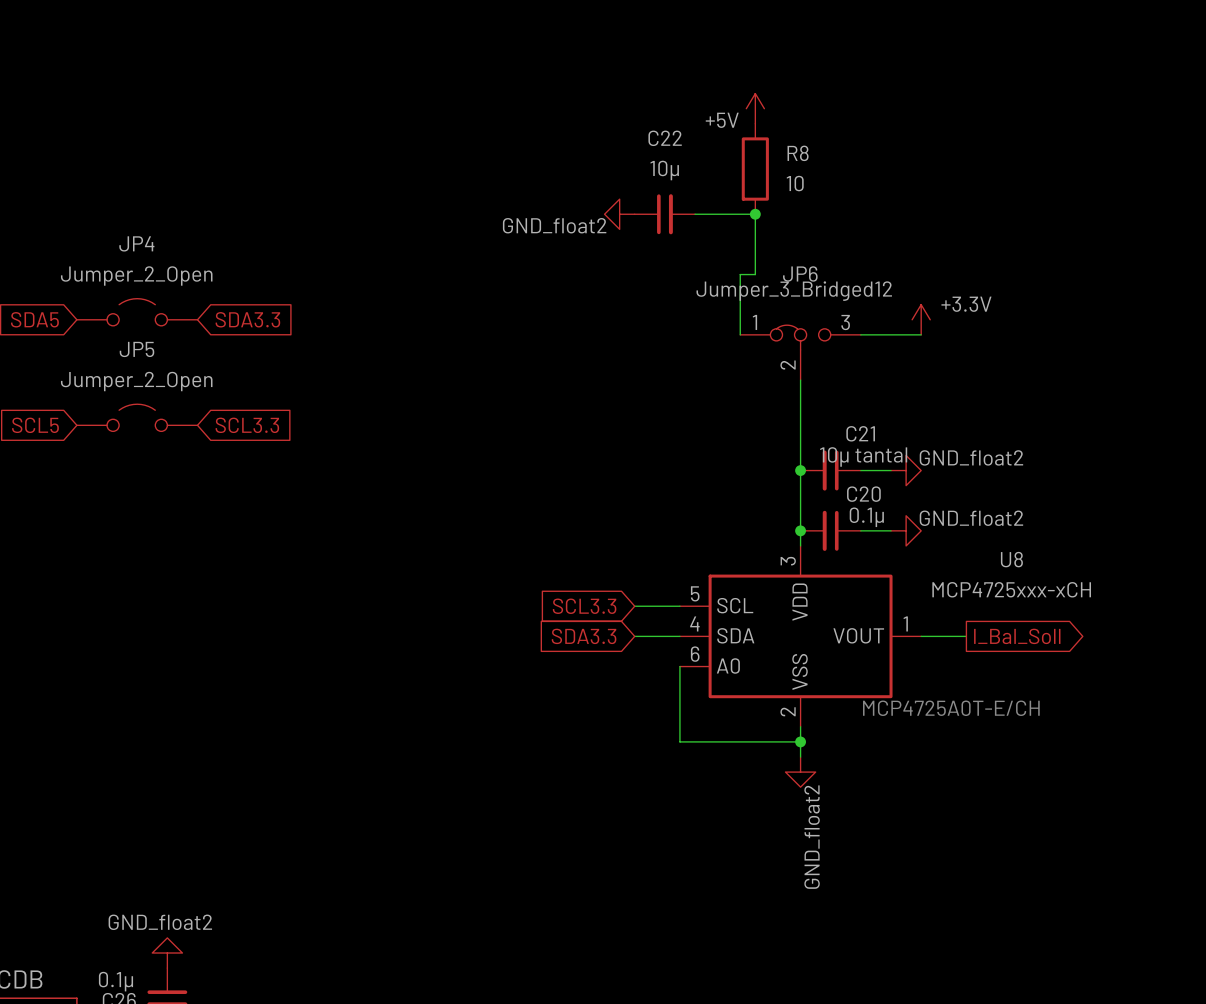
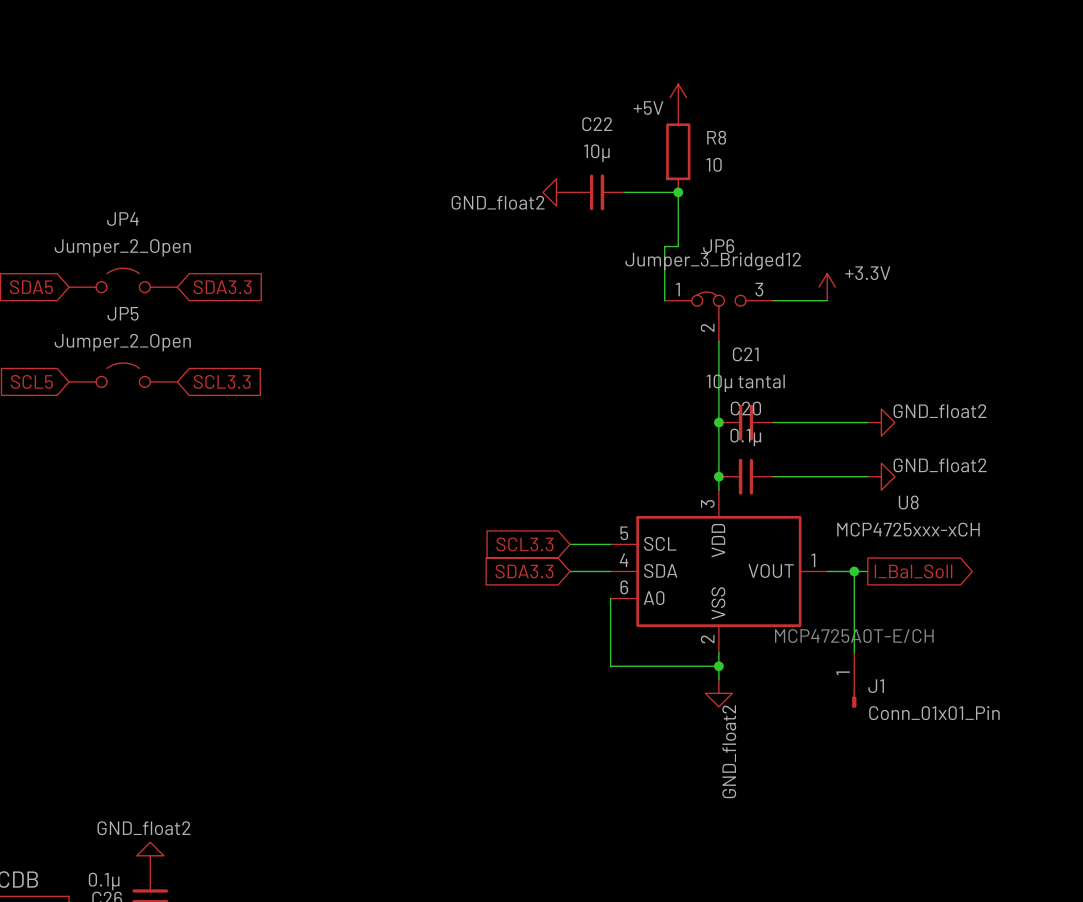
C21 name position: C21 (860, 433) -> C21 (745, 354)
C21 value position: 10µ tantal (863, 456) -> 10µ tantal (745, 383)
wire: none -> (800, 422) (867, 422)
power symbol: GND_float2 (906, 470) -> none
power symbol: none -> GND_float2 (881, 422)
C20 name position: C20 (863, 494) -> C20 (745, 408)
C20 value position: 0.1µ (866, 517) -> 0.1µ (745, 437)
wire: none -> (800, 476) (867, 476)
power symbol: GND_float2 (906, 530) -> none
power symbol: none -> GND_float2 (881, 476)
wire: none -> (854, 571) (854, 652)
junction: none -> (854, 571)
J1: none -> Conn_01x01_Pin (854, 680)

